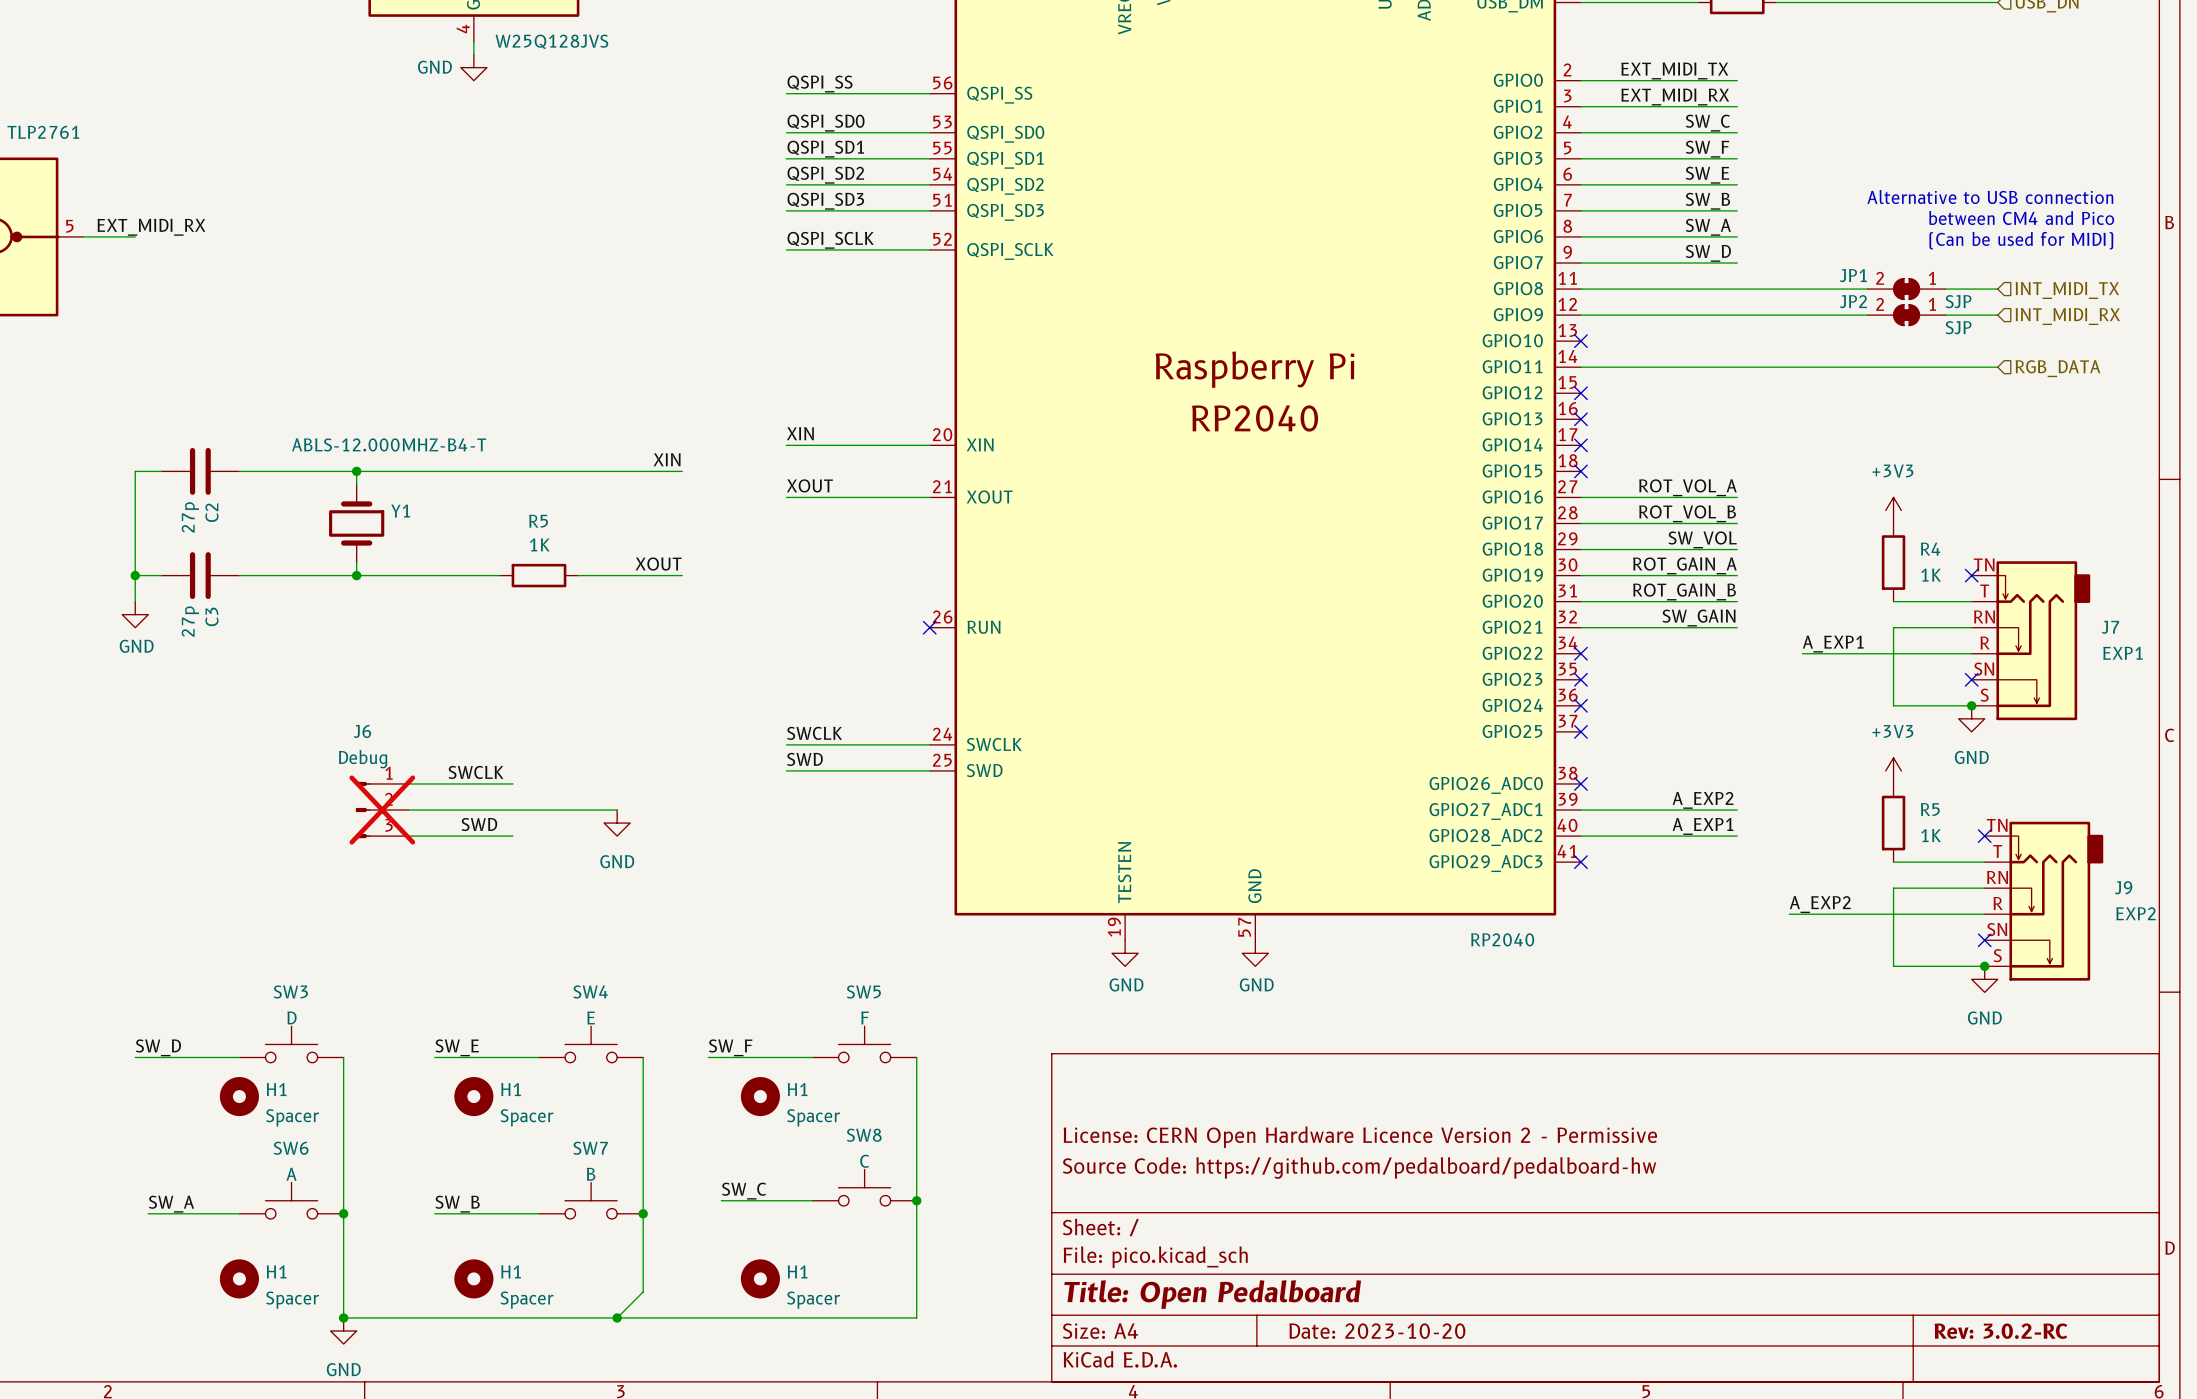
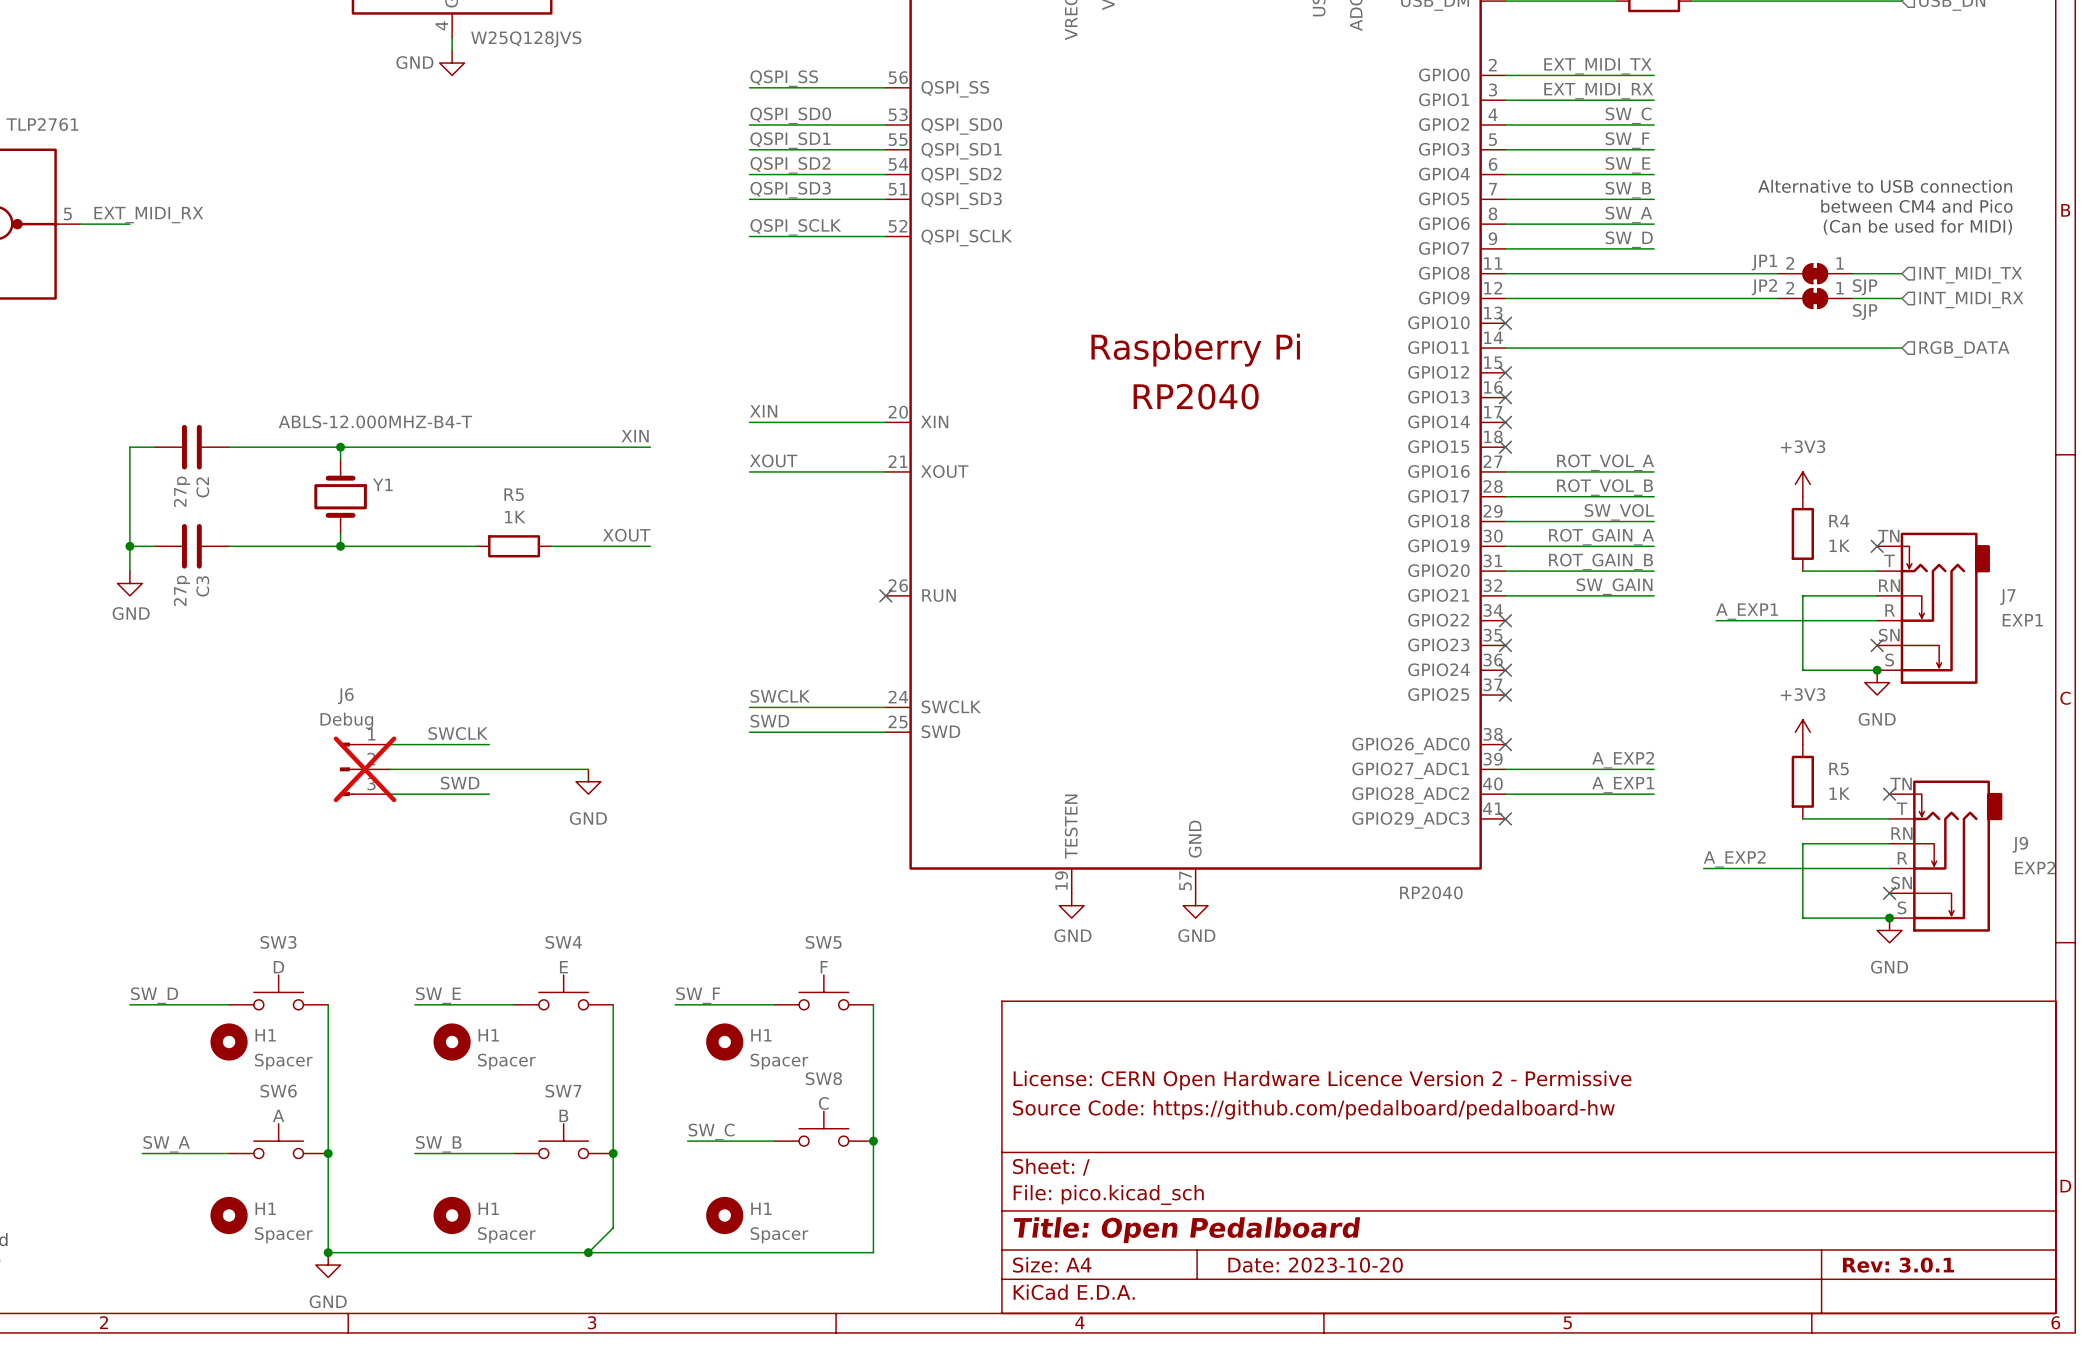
title block: Rev: 3.0.2-RC (2000, 1331) -> Rev: 3.0.1 (1898, 1265)

